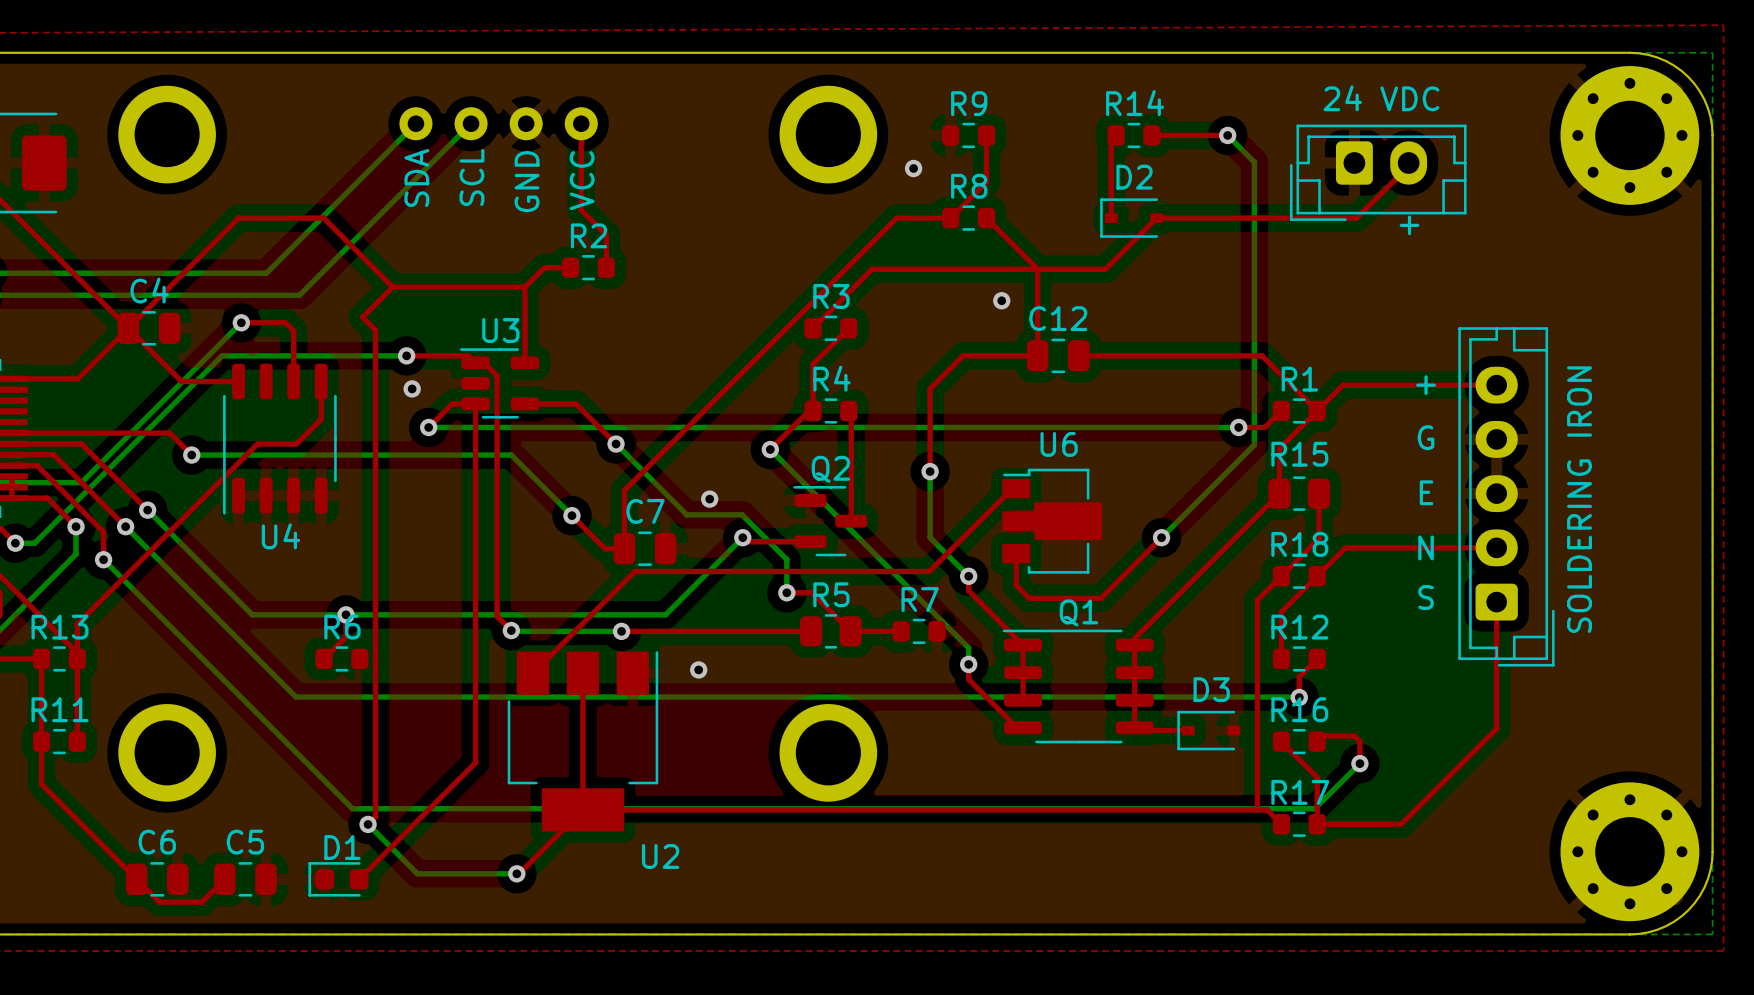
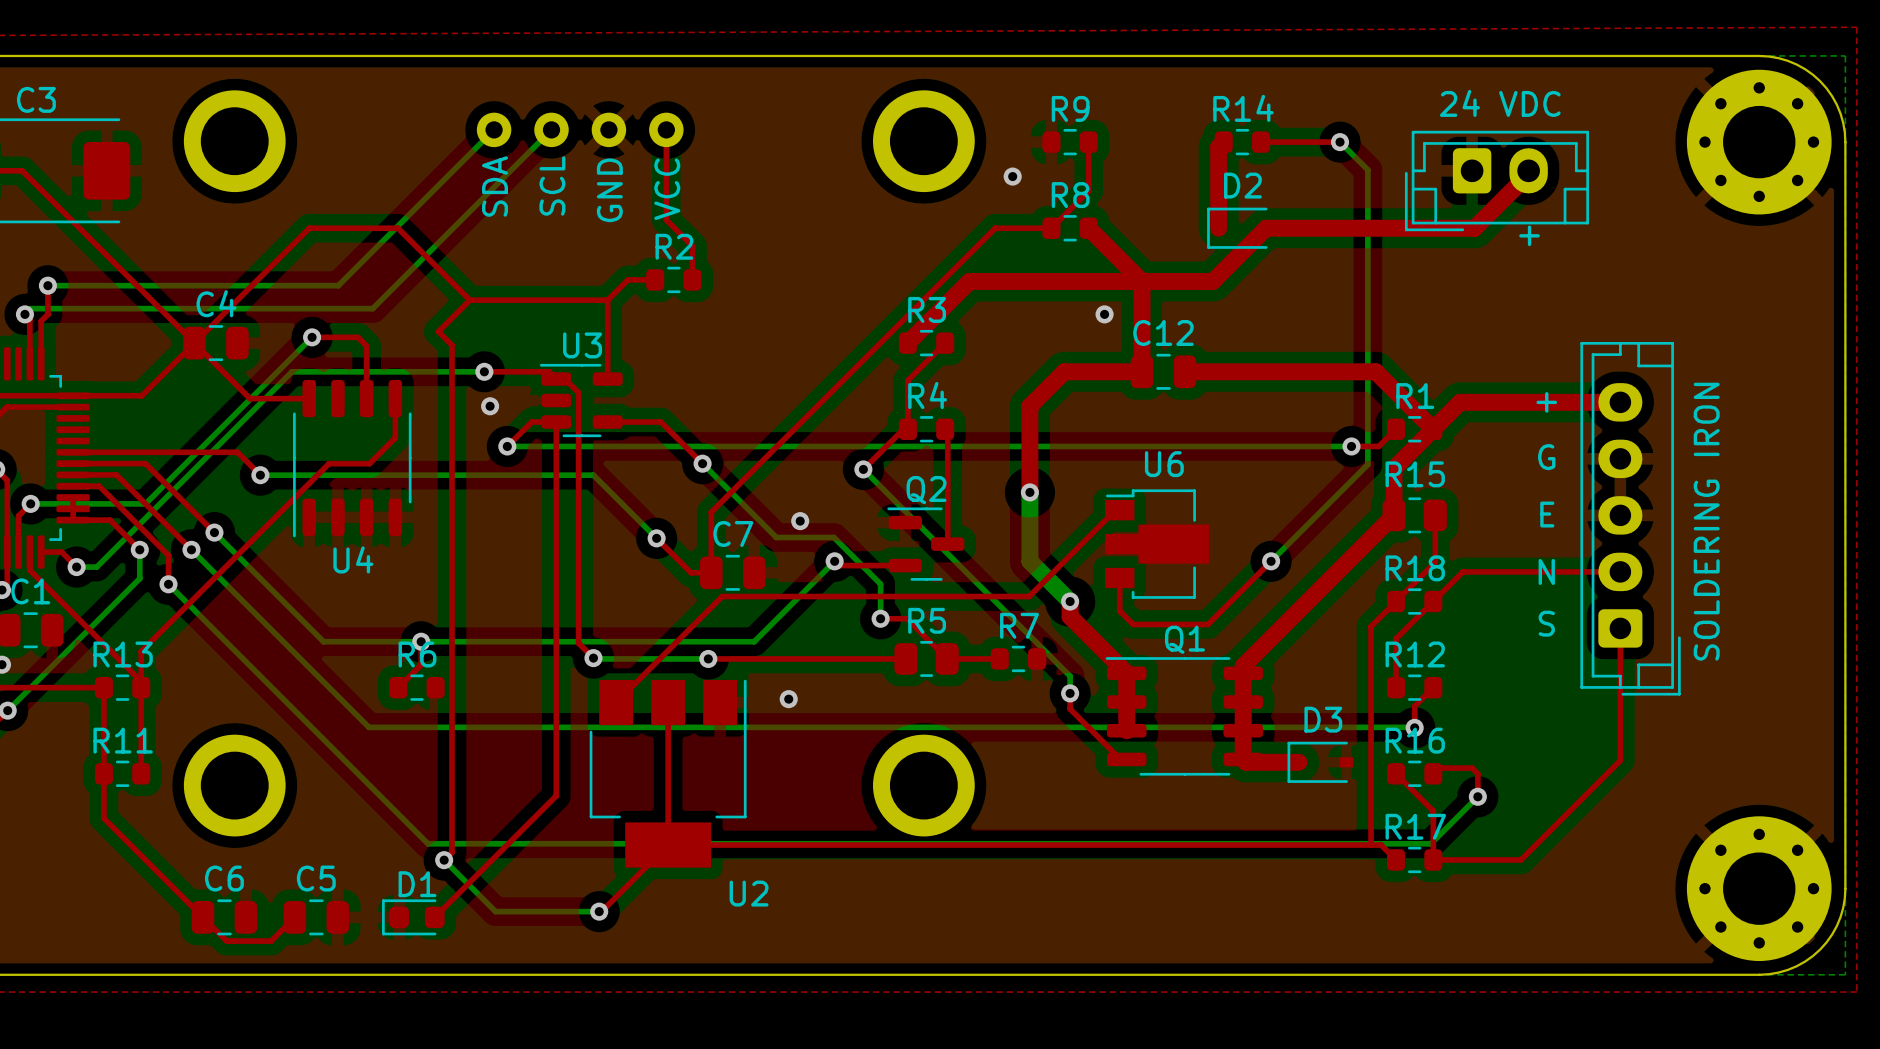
top track width: thin (1116, 135) (1111, 140) (1111, 218) -> thick (1223, 142) (1218, 147) (1218, 228)
top track width: thin (1408, 166) (1356, 218) (1156, 218) (1105, 269) (872, 269) (813, 328) -> thick (1528, 174) (1474, 228) (1266, 228) (1212, 281) (969, 281) (907, 343)
top track width: thin (986, 218) (1037, 269) (1037, 355) (963, 355) (930, 388) (930, 471) -> thick (1088, 228) (1142, 281) (1142, 371) (1064, 371) (1029, 406) (1029, 492)
top track width: thin (1078, 355) (1262, 355) (1317, 410) -> thick (1184, 371) (1375, 371) (1433, 429)
top track width: thin (1496, 385) (1343, 385) (1279, 448) (1279, 493) (1134, 638) (1134, 727) (1137, 730) (1188, 730) -> thick (1620, 402) (1460, 402) (1394, 468) (1394, 515) (1243, 666) (1243, 759) (1246, 762) (1299, 762)
bottom track width: thin (930, 471) (930, 537) (968, 576) -> thick (1029, 492) (1029, 561) (1070, 601)
top track width: thin (968, 576) (968, 590) (1023, 645) (1023, 700) -> thick (1070, 601) (1070, 616) (1126, 673) (1126, 730)

